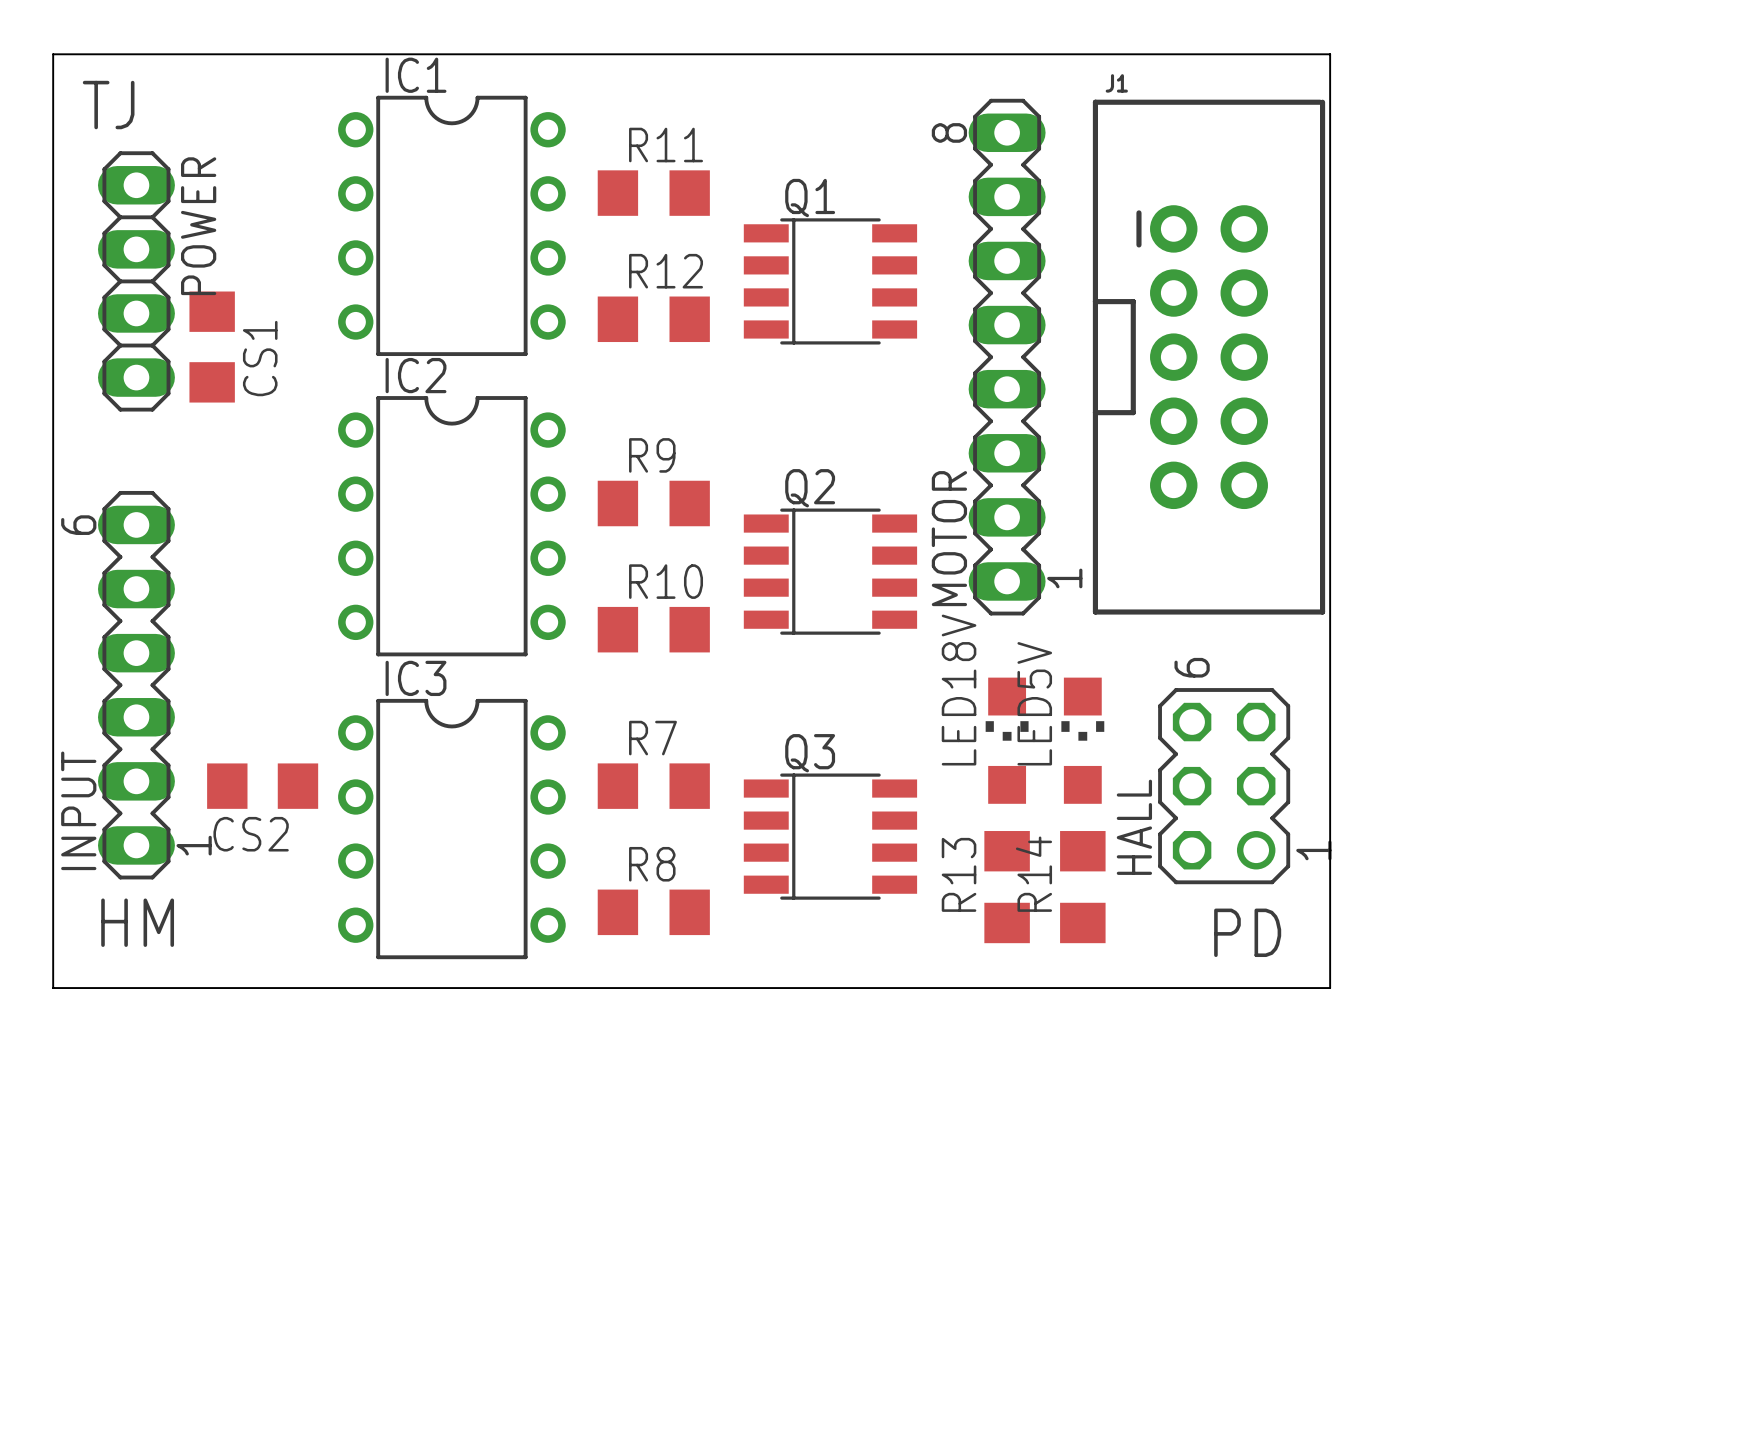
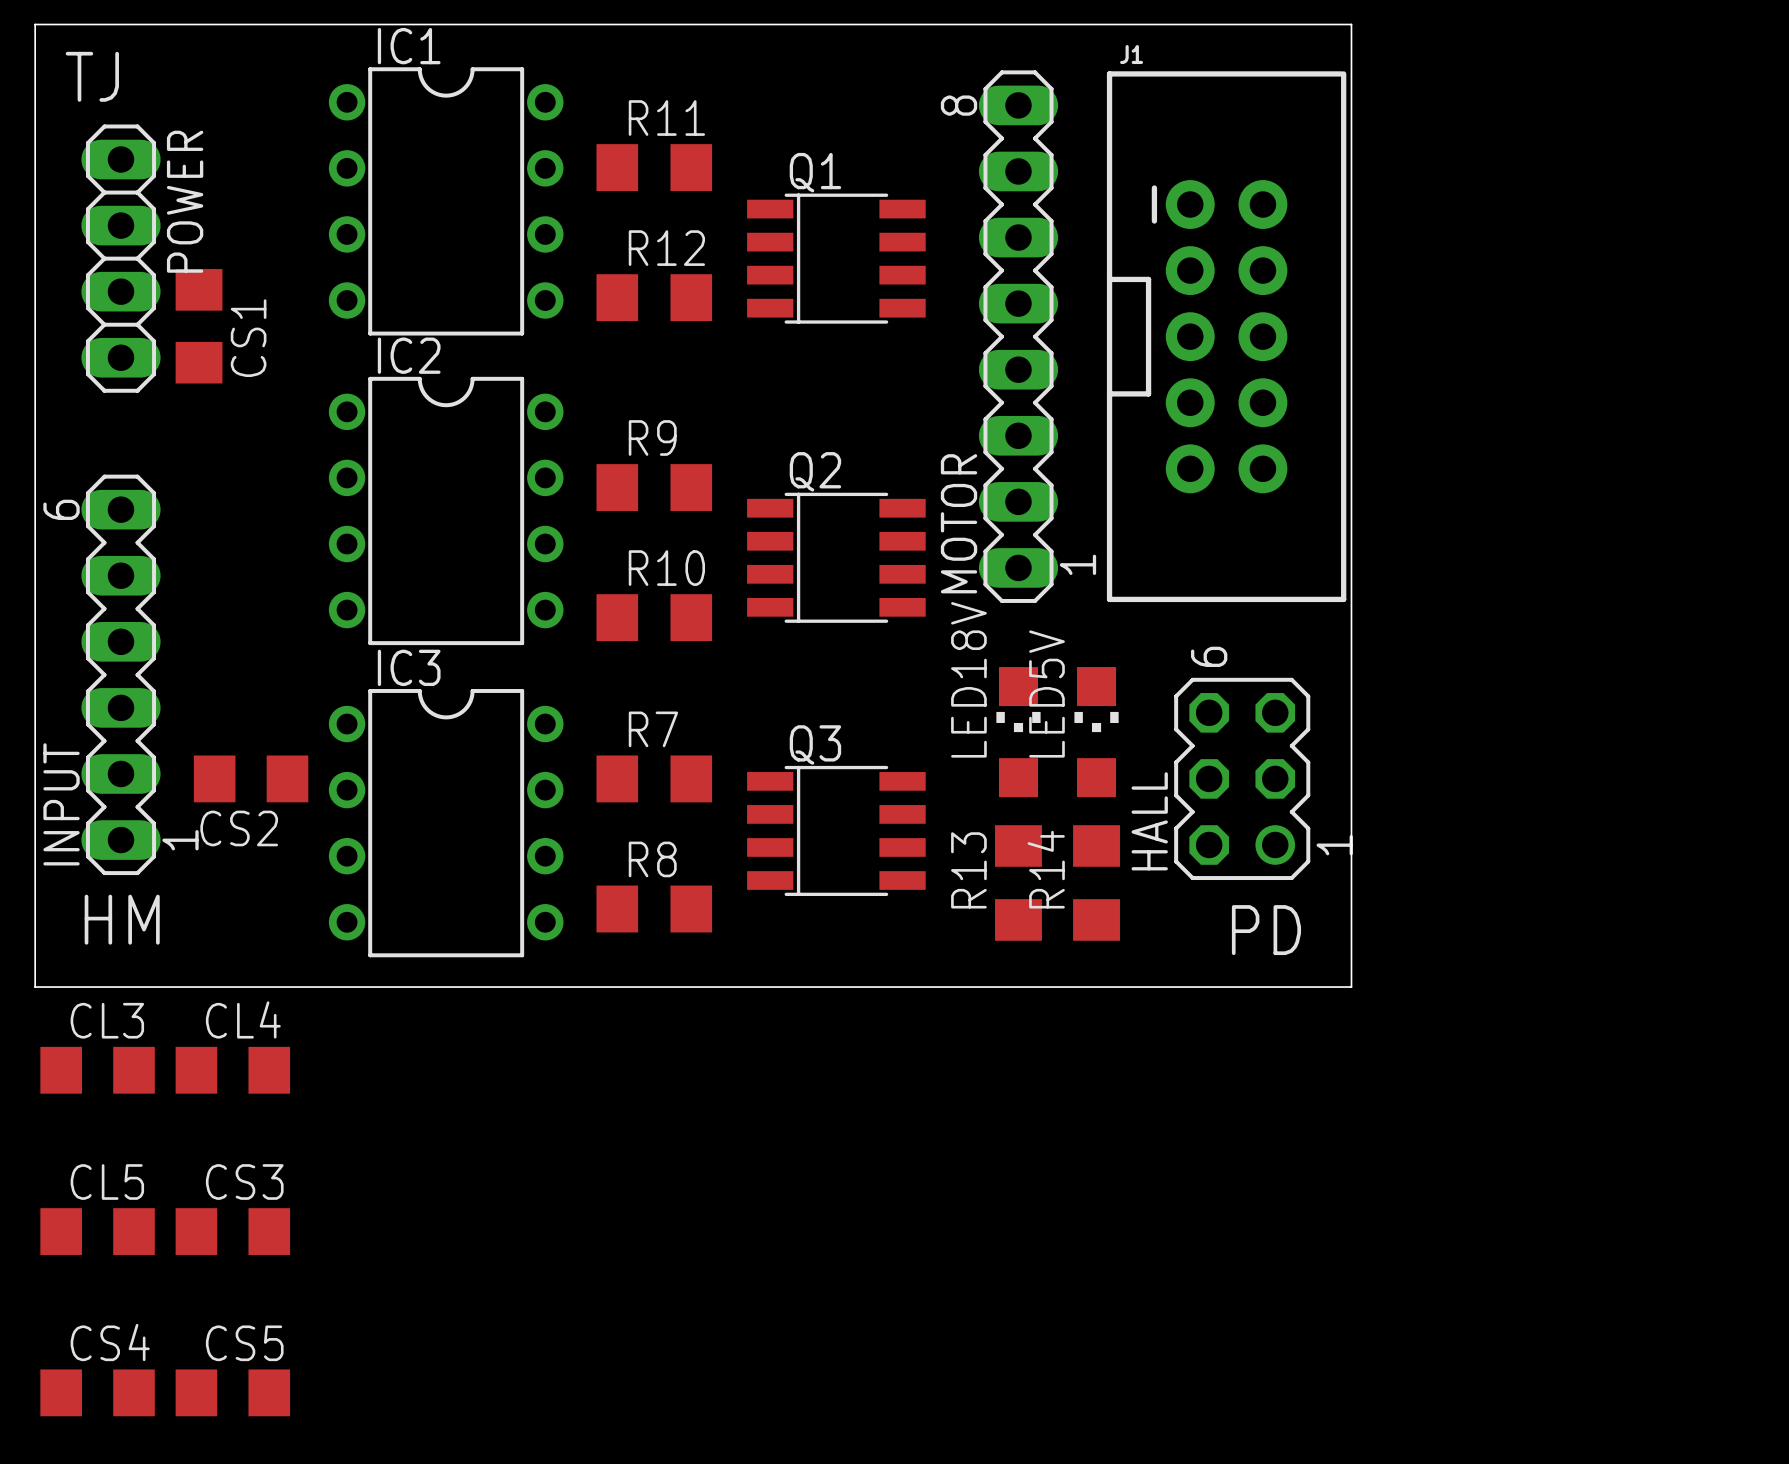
CL3: none -> (97, 1070)
CL4: none -> (232, 1070)
CL5: none -> (97, 1231)
CS3: none -> (232, 1231)
CS4: none -> (97, 1392)
CS5: none -> (232, 1392)

